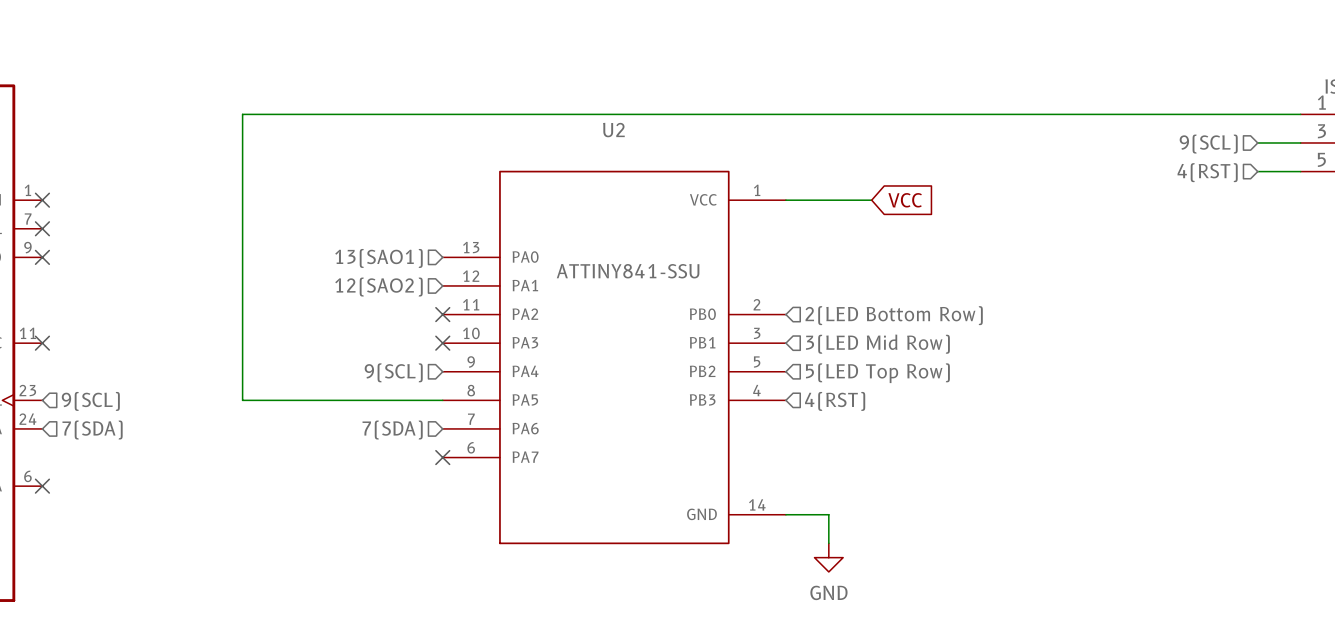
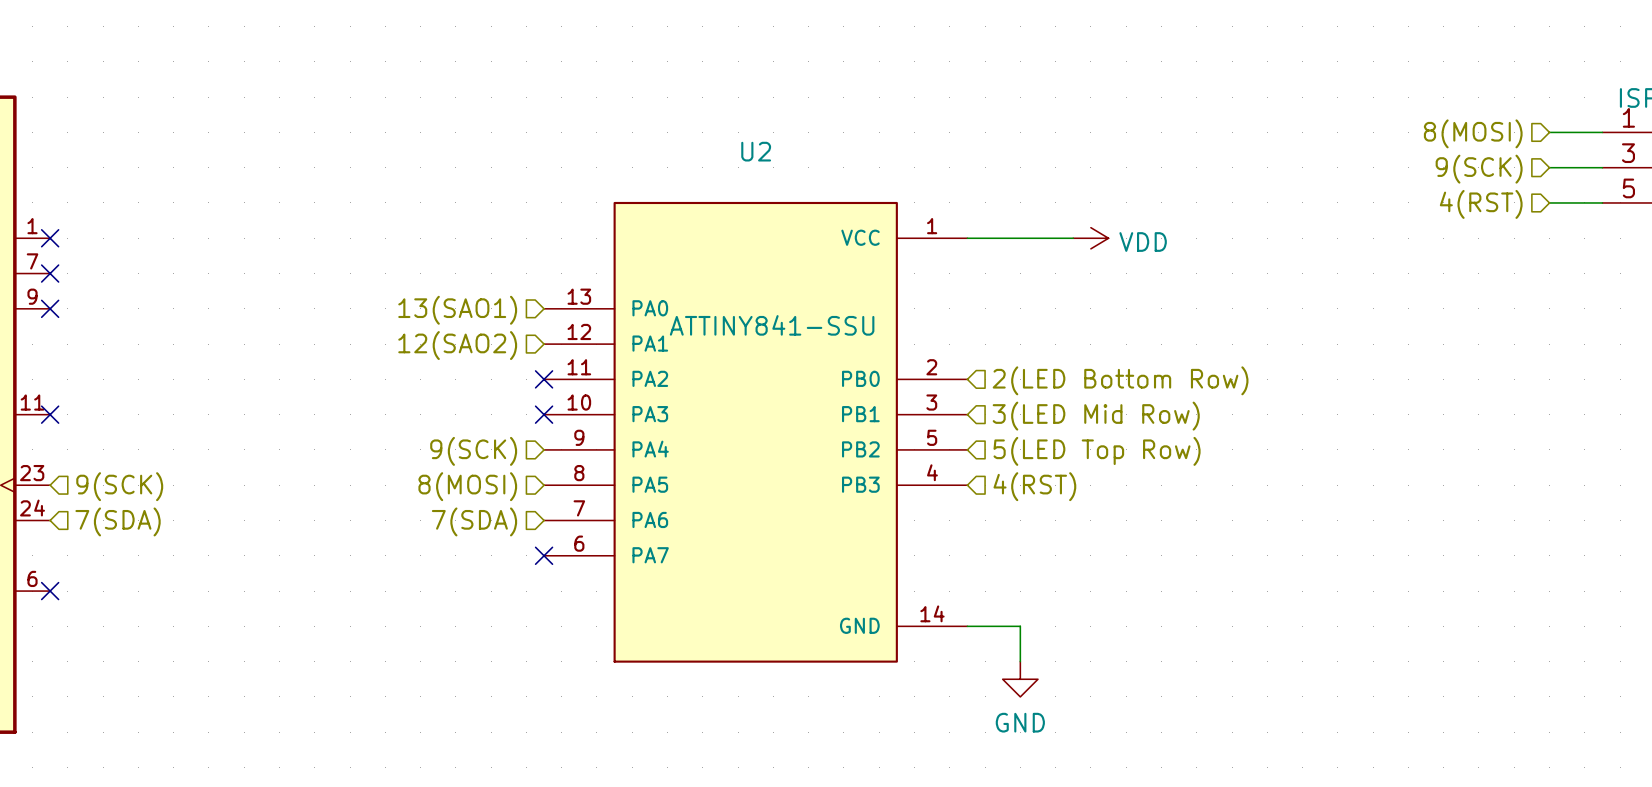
wire: (1257, 114) (242, 114) (242, 400) (442, 400) -> none
hierarchical label: none -> 8(MOSI) (1473, 133)
hierarchical label: 9(SCL) (1208, 144) -> 9(SCK) (1479, 169)
power symbol: none -> VDD (1090, 238)
global label: VCC (905, 200) -> none
hierarchical label: 9(SCL) (393, 372) -> 9(SCK) (473, 451)
hierarchical label: 9(SCL) (90, 401) -> 9(SCK) (119, 486)
hierarchical label: none -> 8(MOSI) (467, 486)

